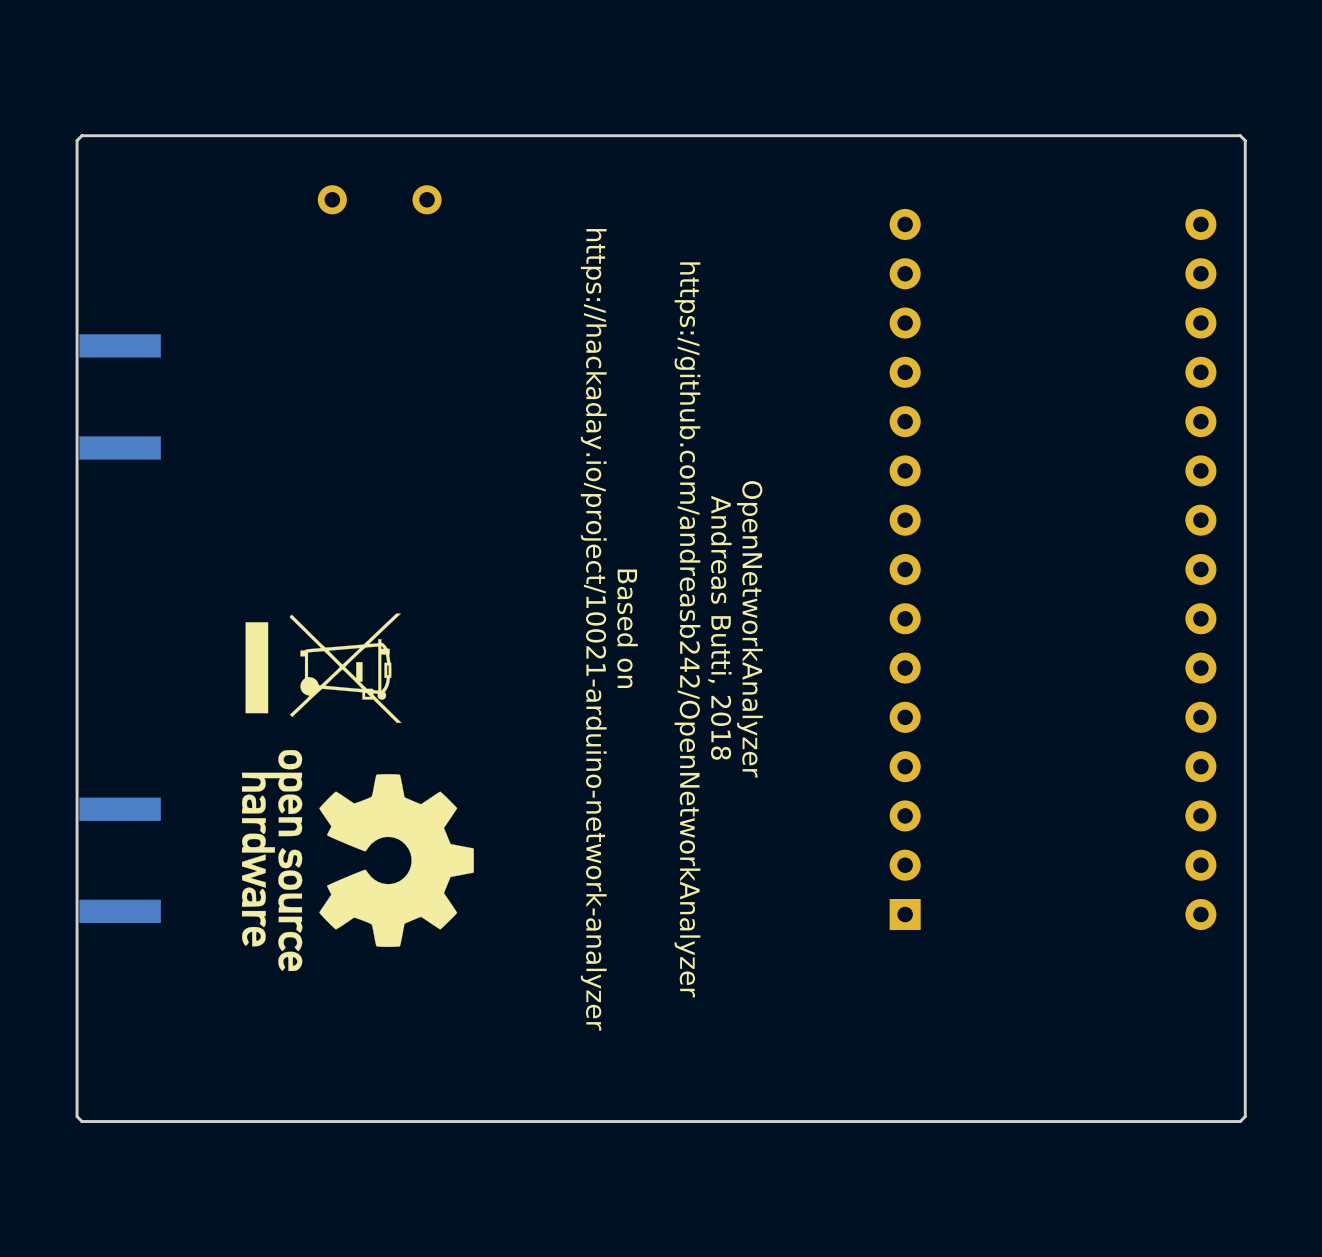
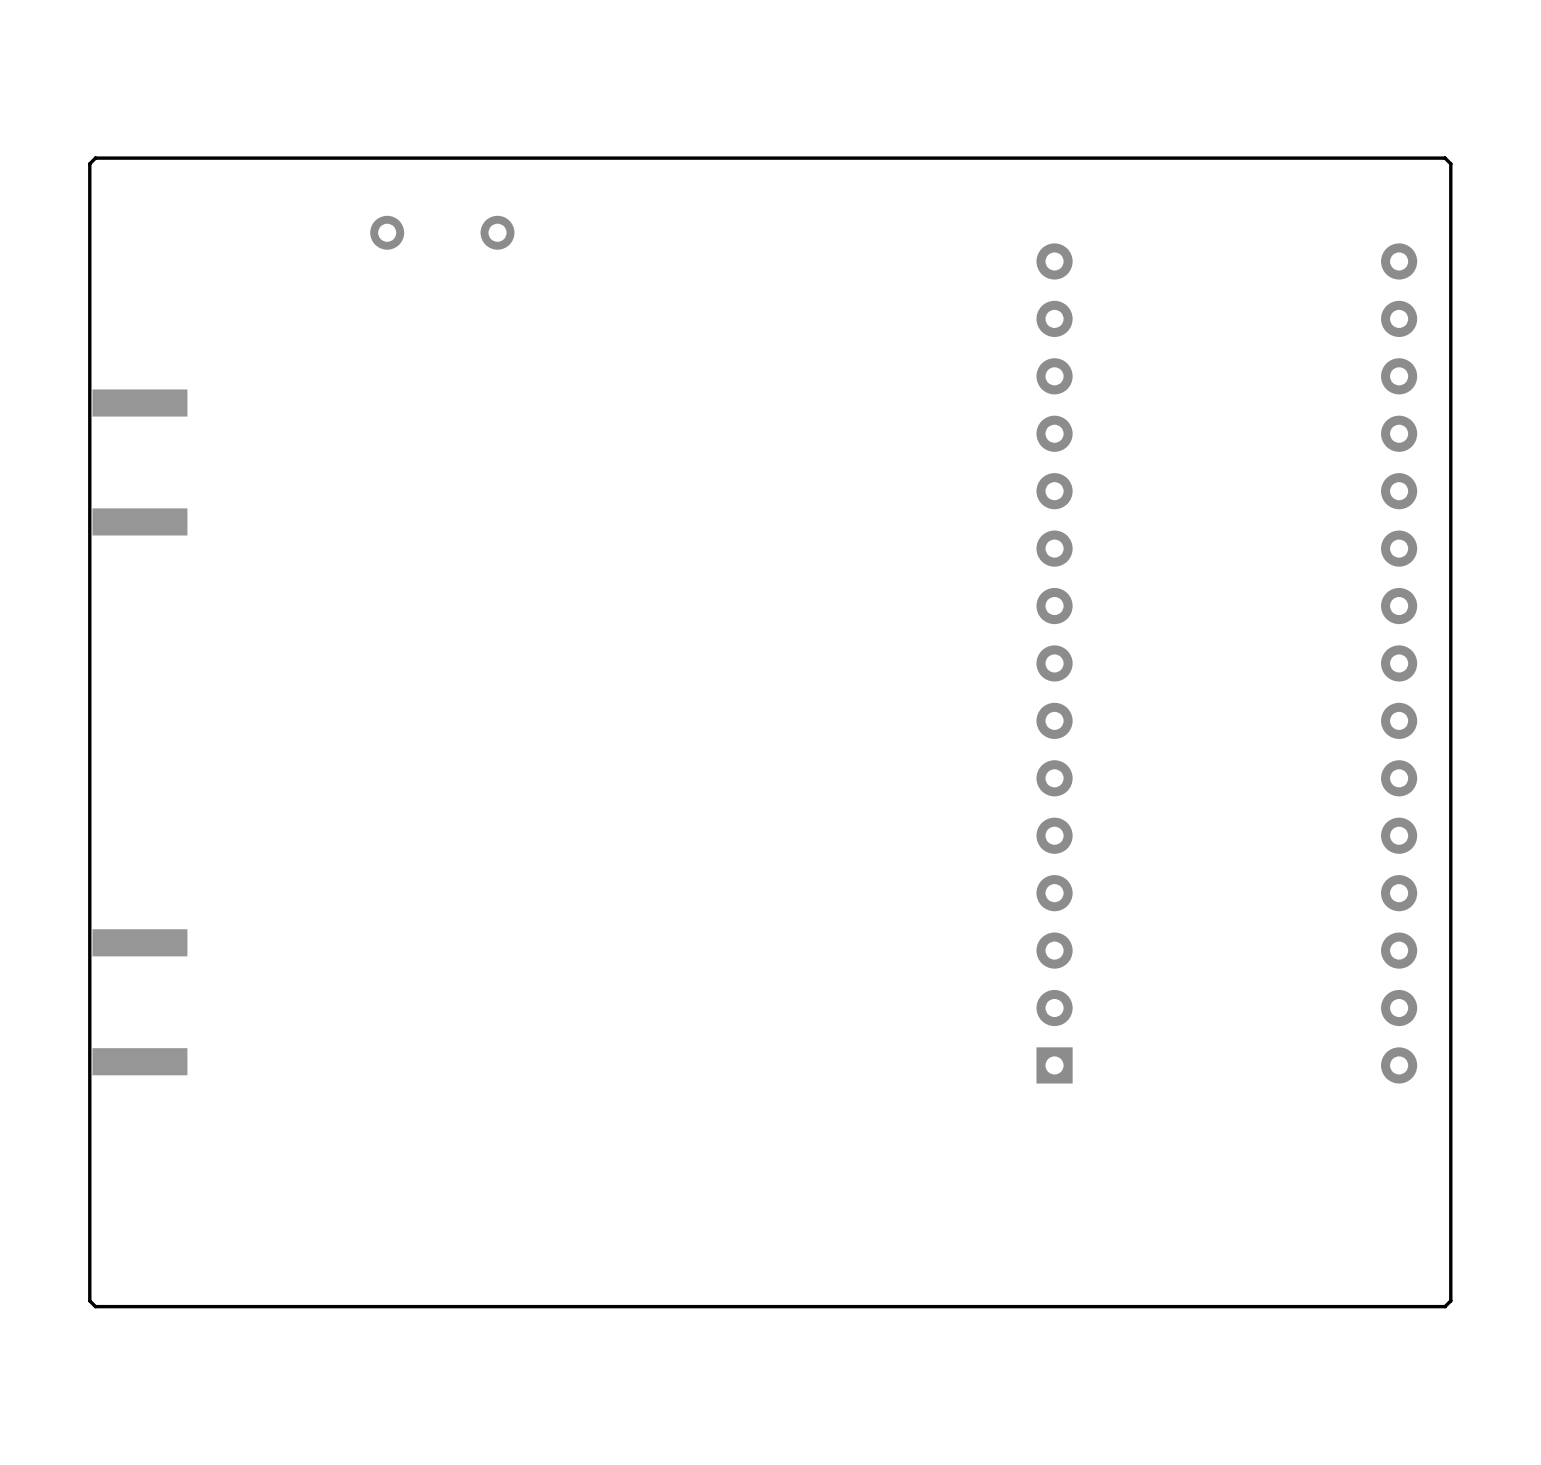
drawing: [245, 613, 402, 723] -> none
text: Andreas Butti, 2018 (719, 627) -> none
text: Based on (627, 628) -> none
text: https://hackaday.io/project/10021-arduino-network-analyzer (593, 629) -> none
text: https://github.com/andreasb242/OpenNetworkAnalyzer (687, 629) -> none
text: OpenNetworkAnalyzer (749, 629) -> none
drawing: [241, 750, 474, 972] -> none

